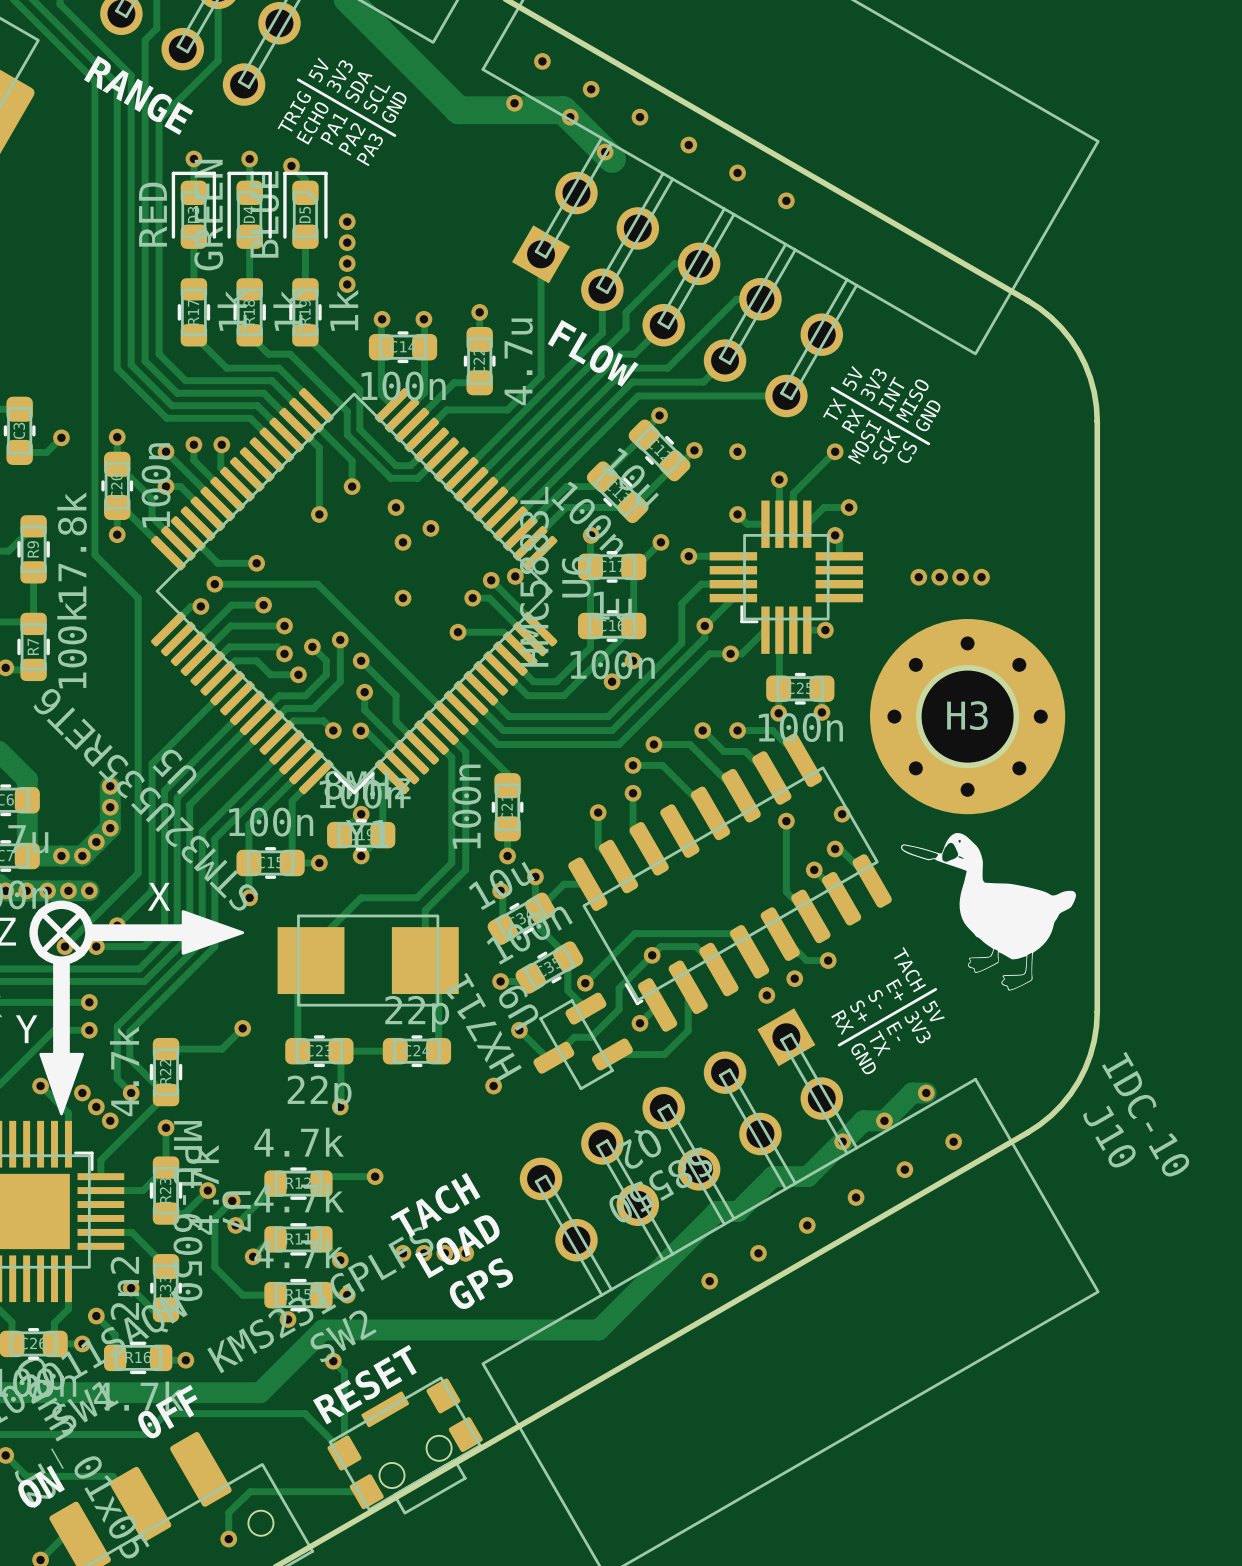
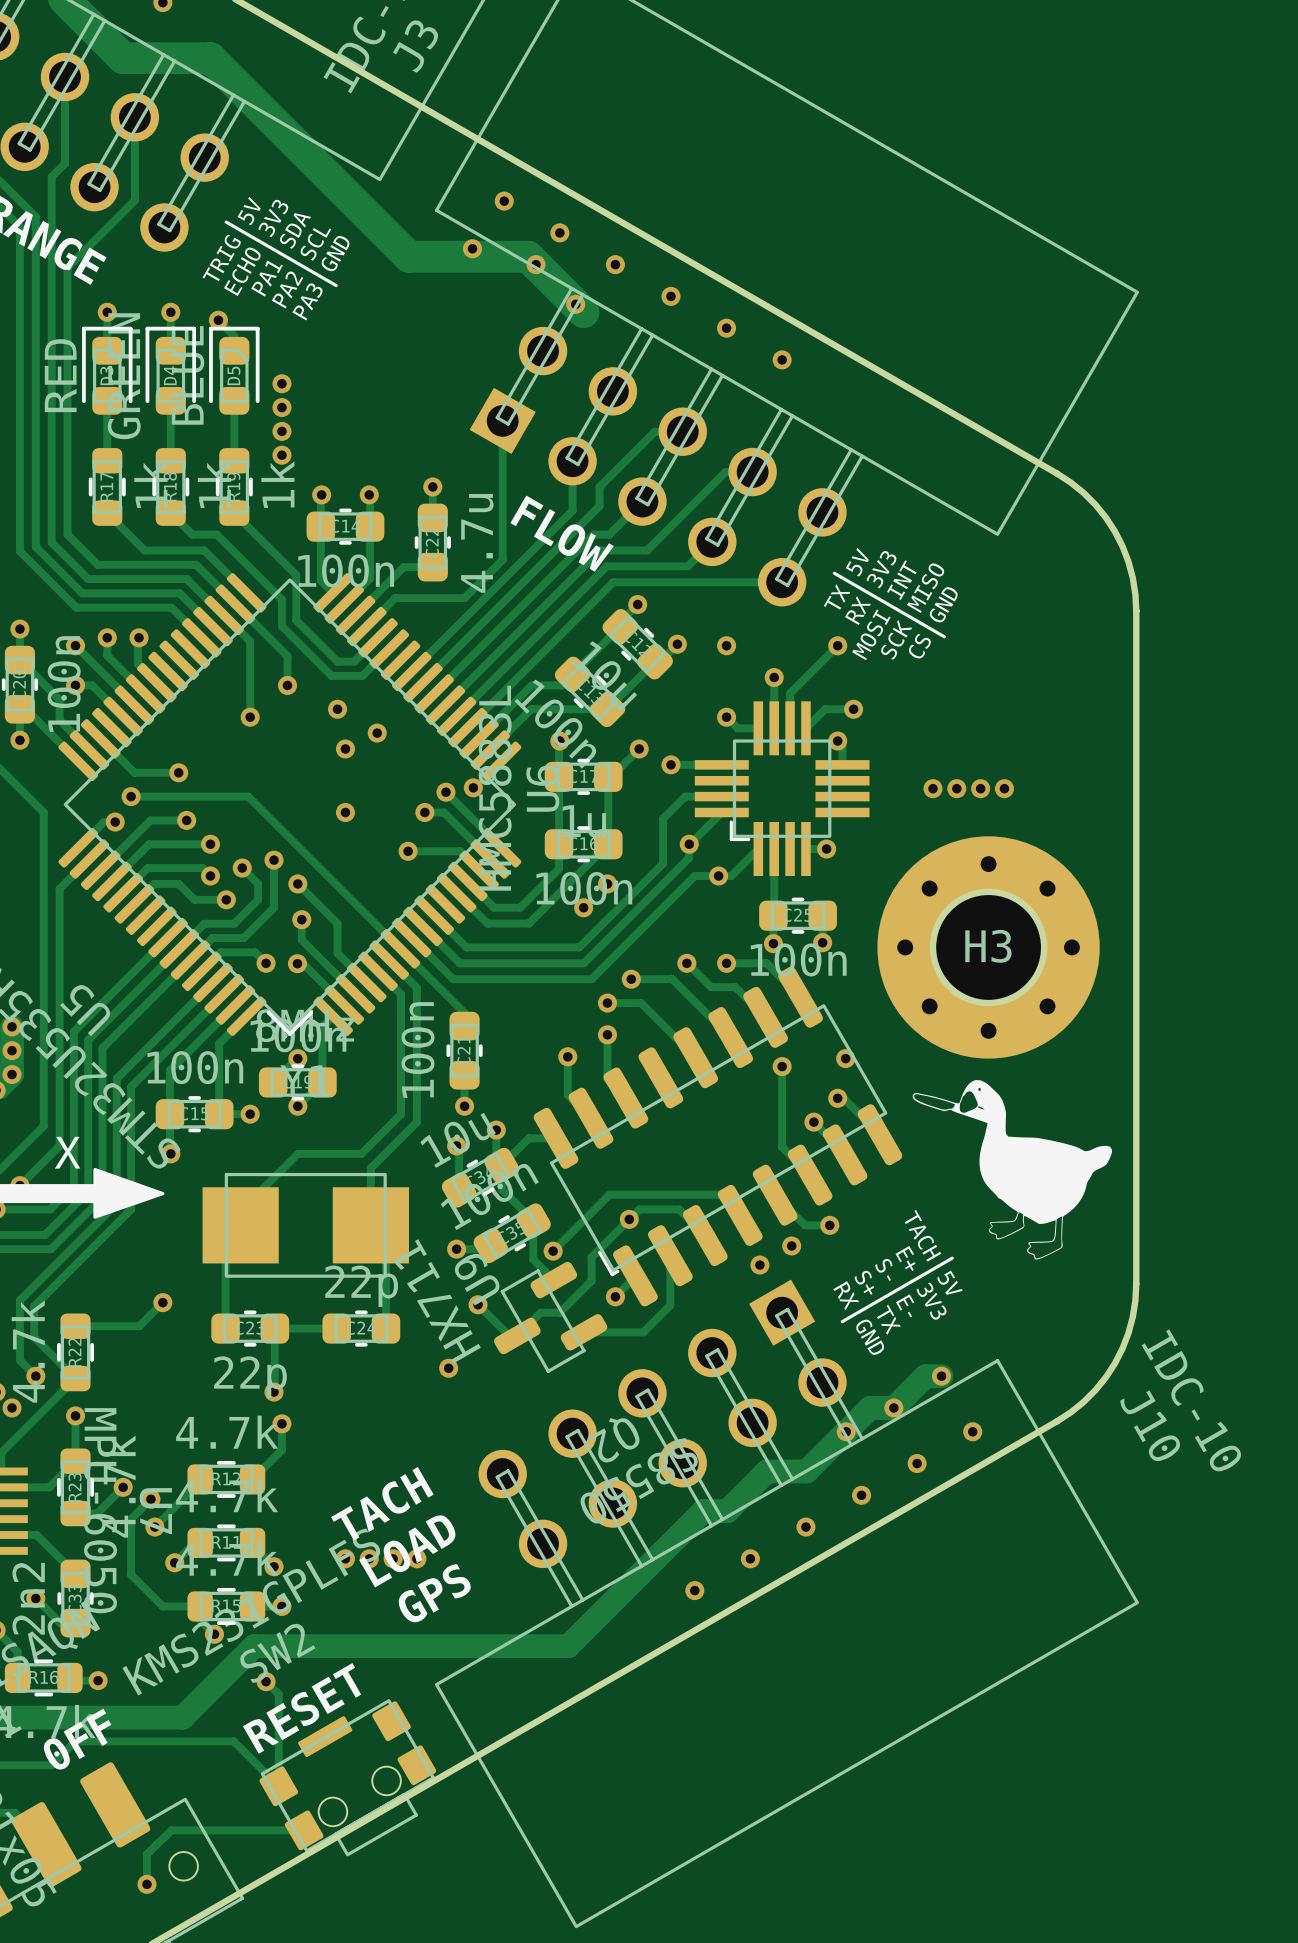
track: (227, 688) (152, 763) -> (89, 859) (59, 888) (59, 1001)
track: (328, 1176) (375, 1176) -> (260, 1471) (281, 1450) (281, 1423)
via position: (375, 1176) -> (281, 1423)

